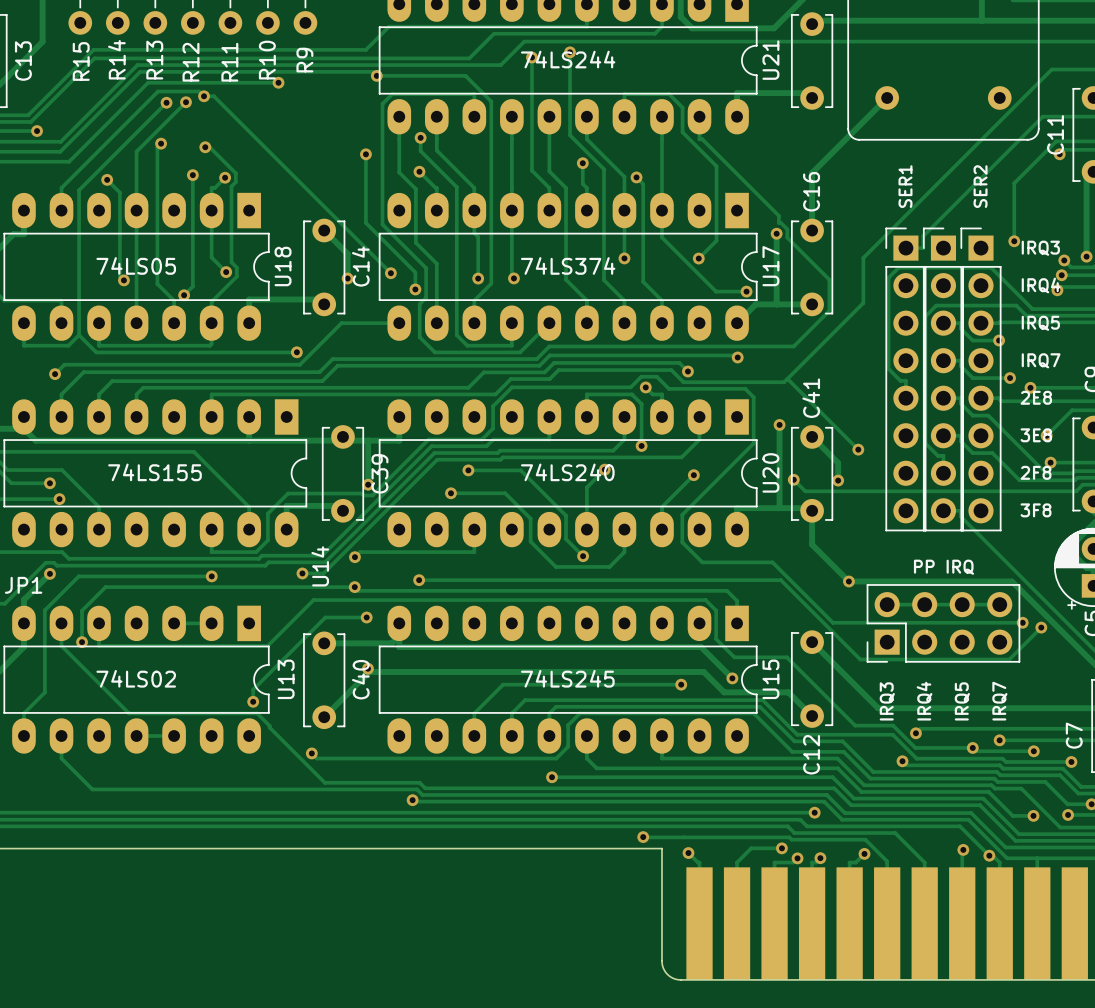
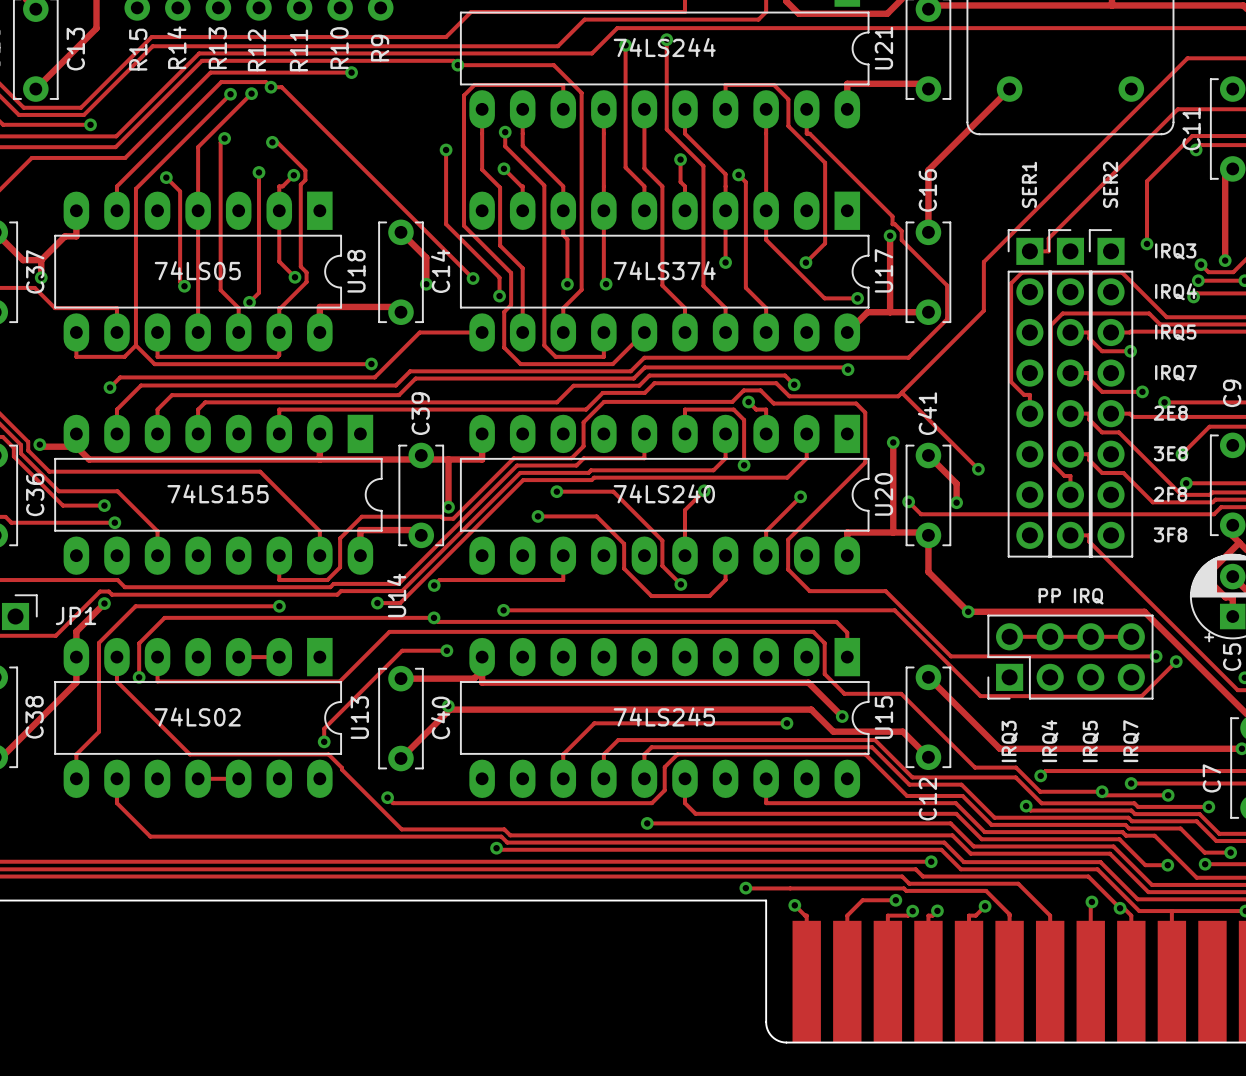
C39 name position: C39 (379, 473) -> C39 (420, 413)

